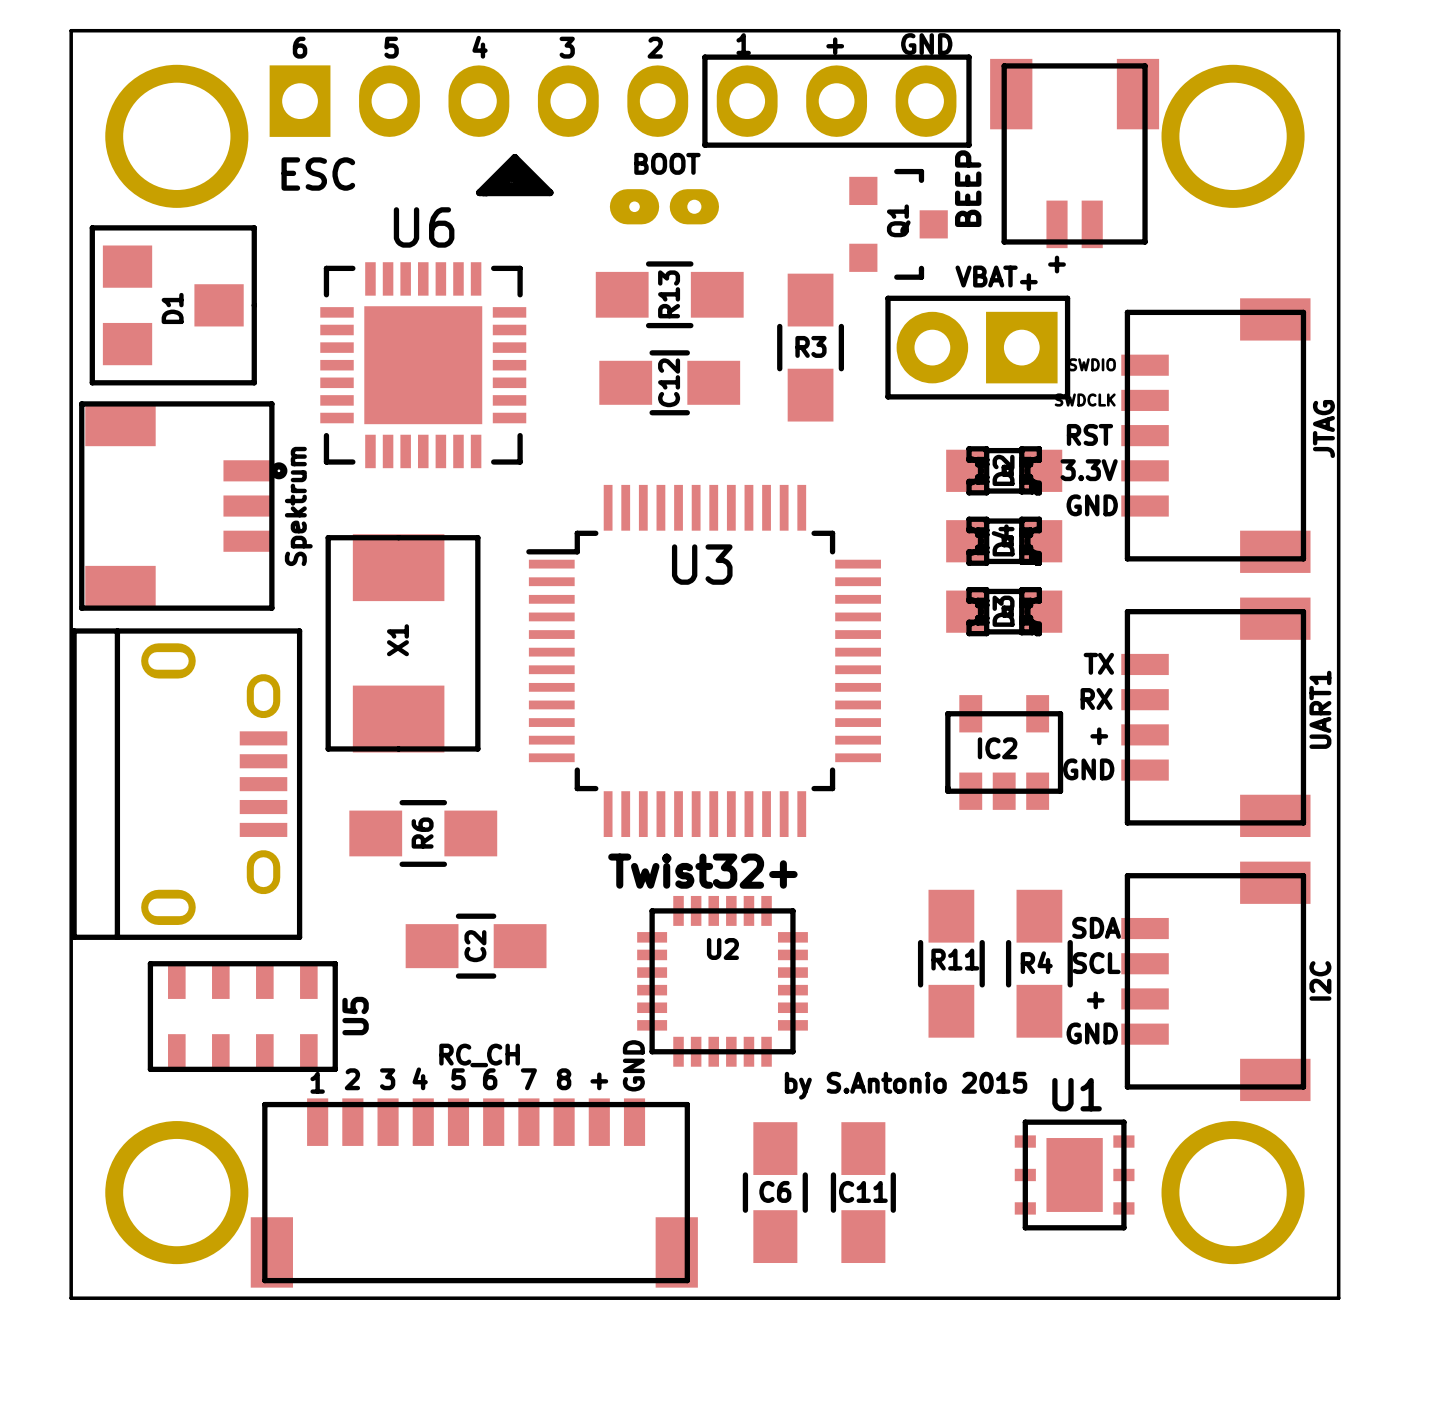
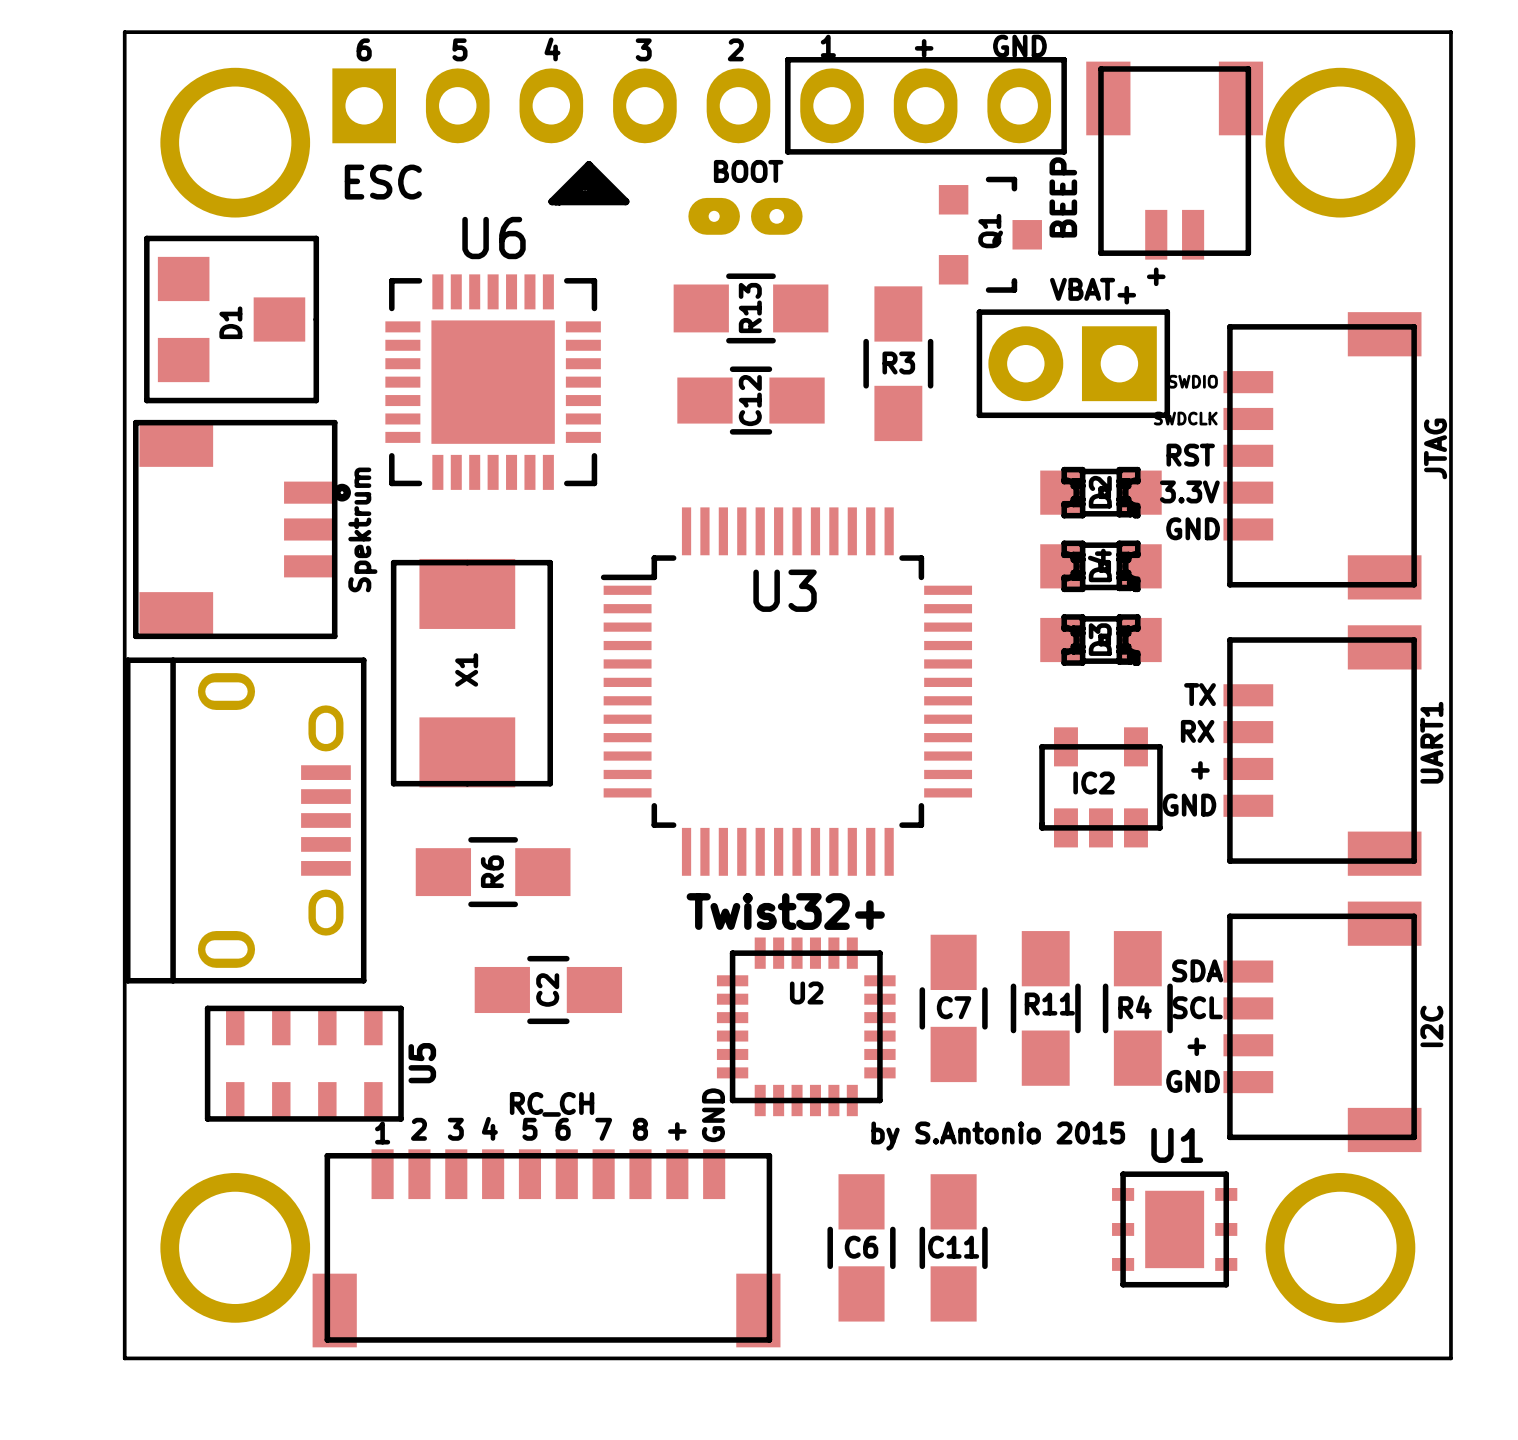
C7: none -> (953, 1008)

